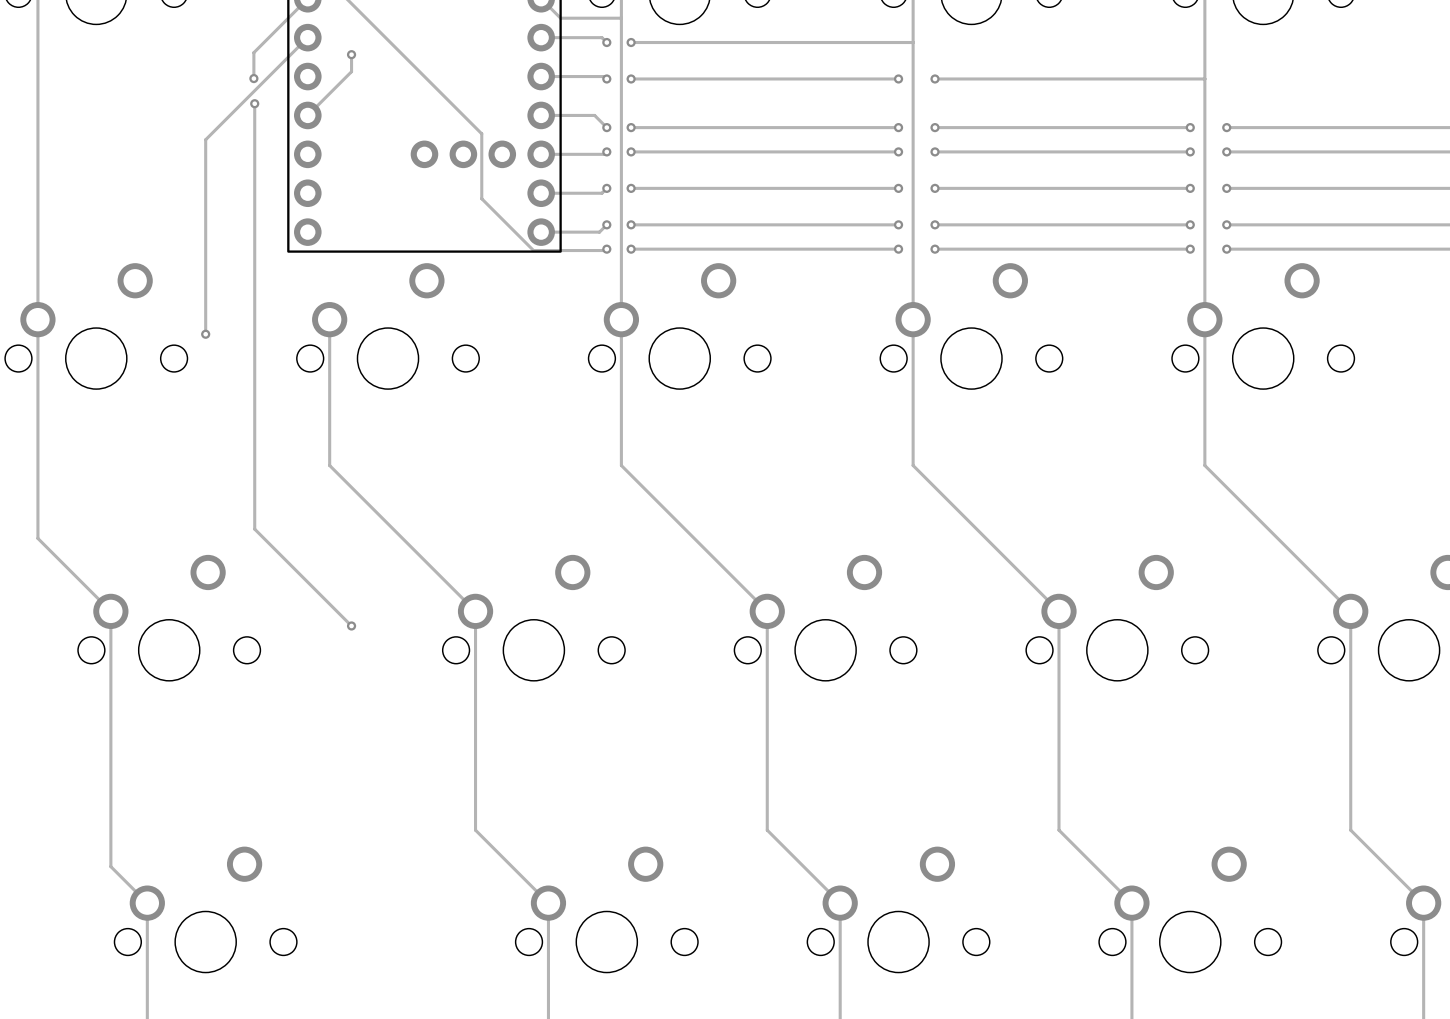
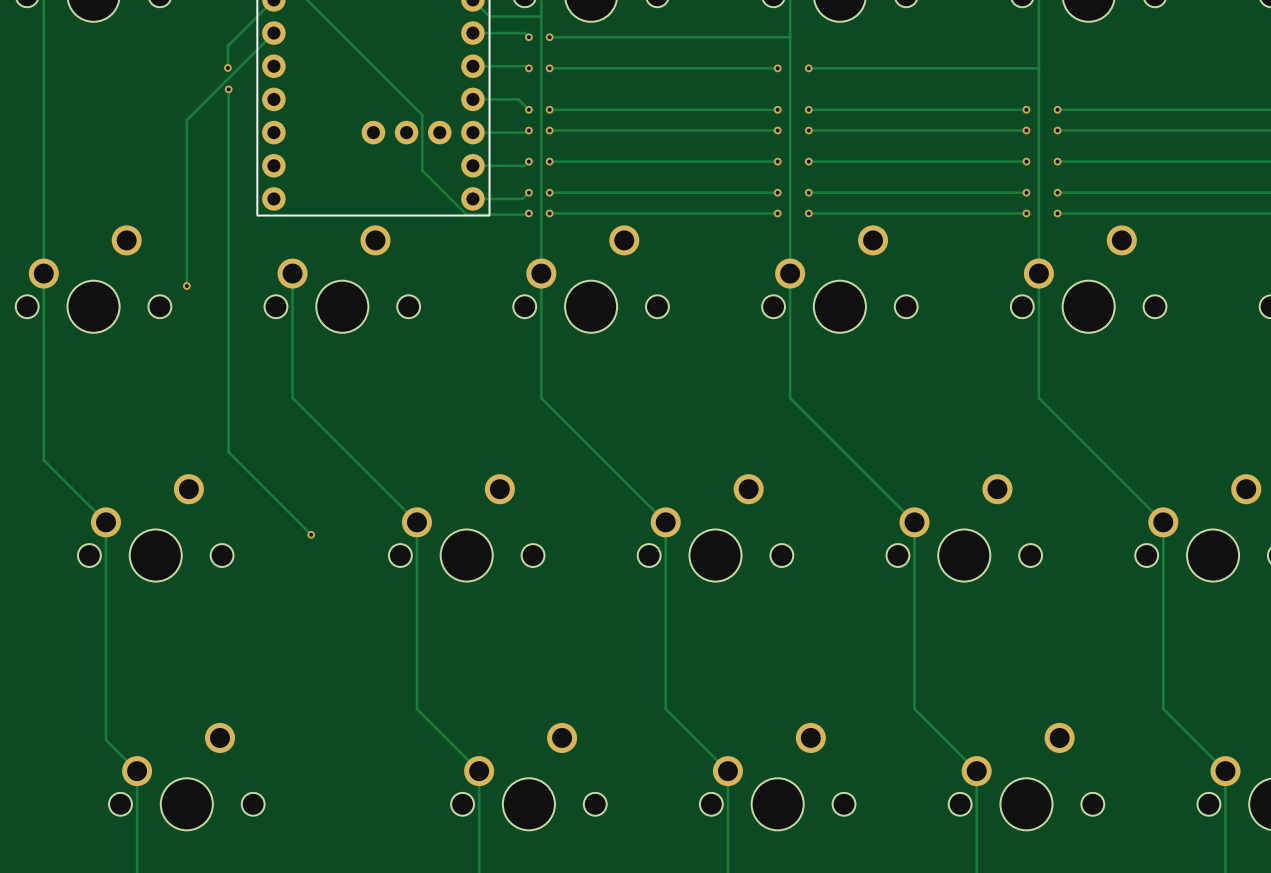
track: (351, 54) (351, 71) (307, 115) -> none
via: (351, 54) -> none

